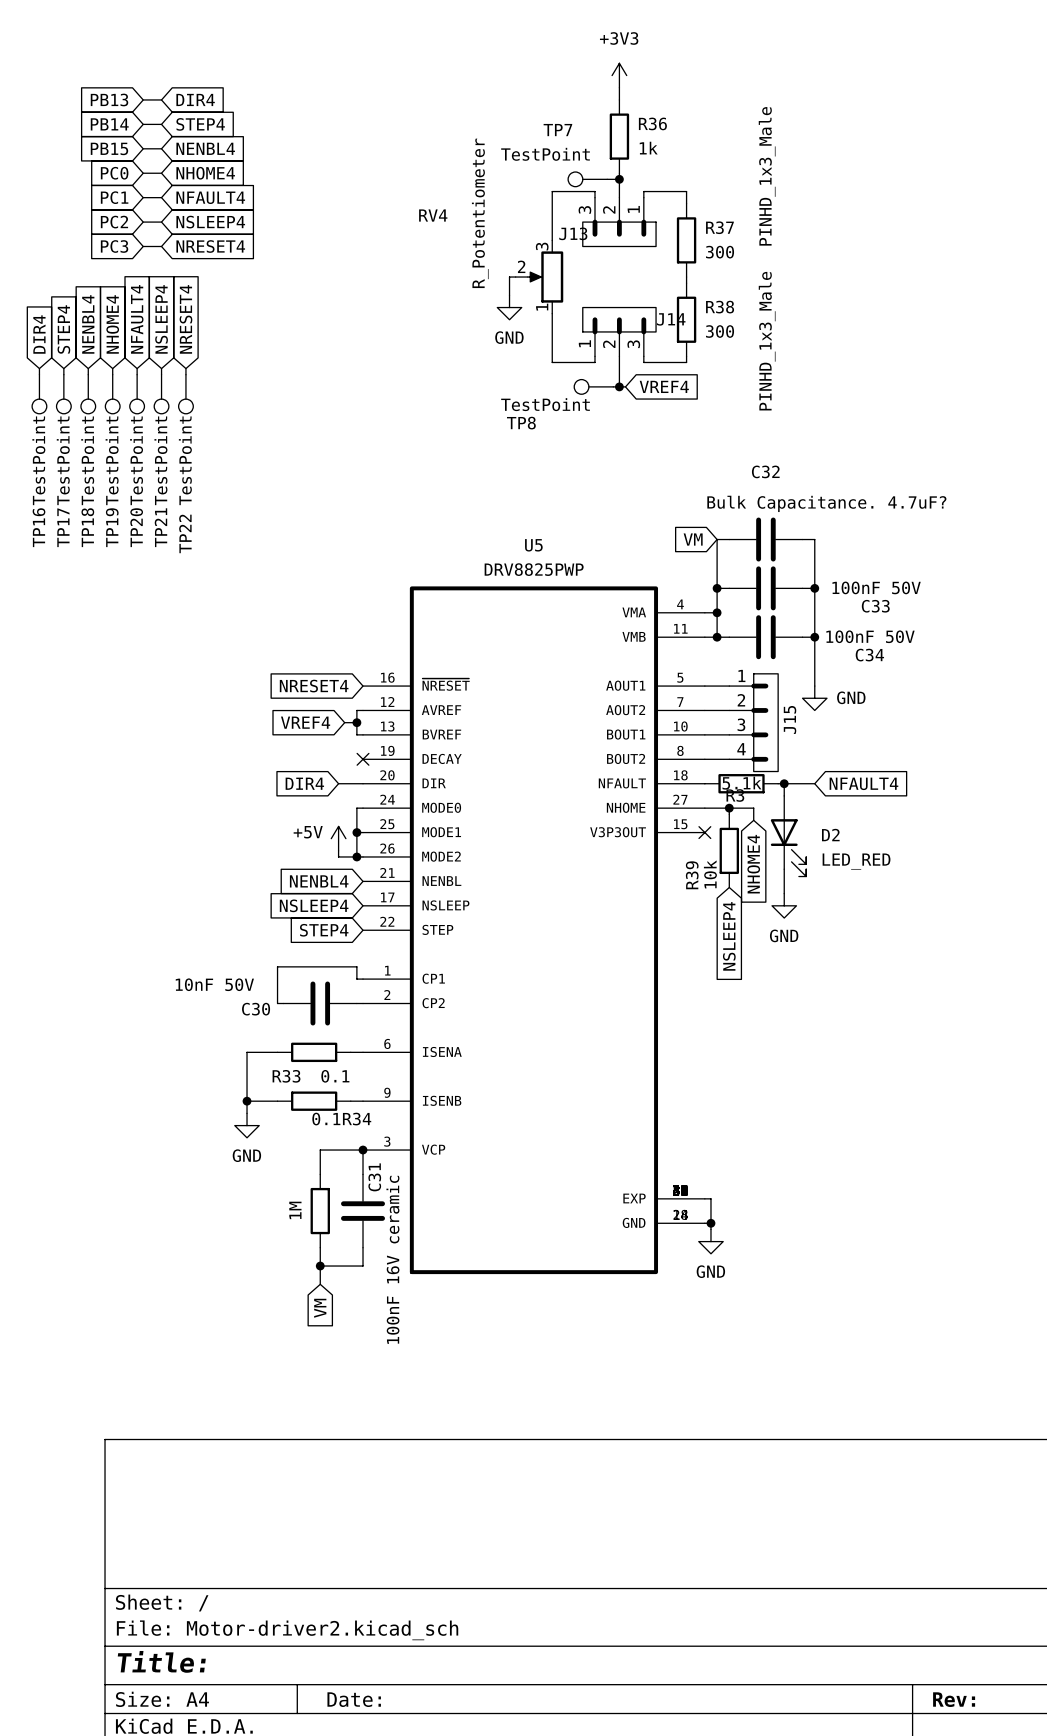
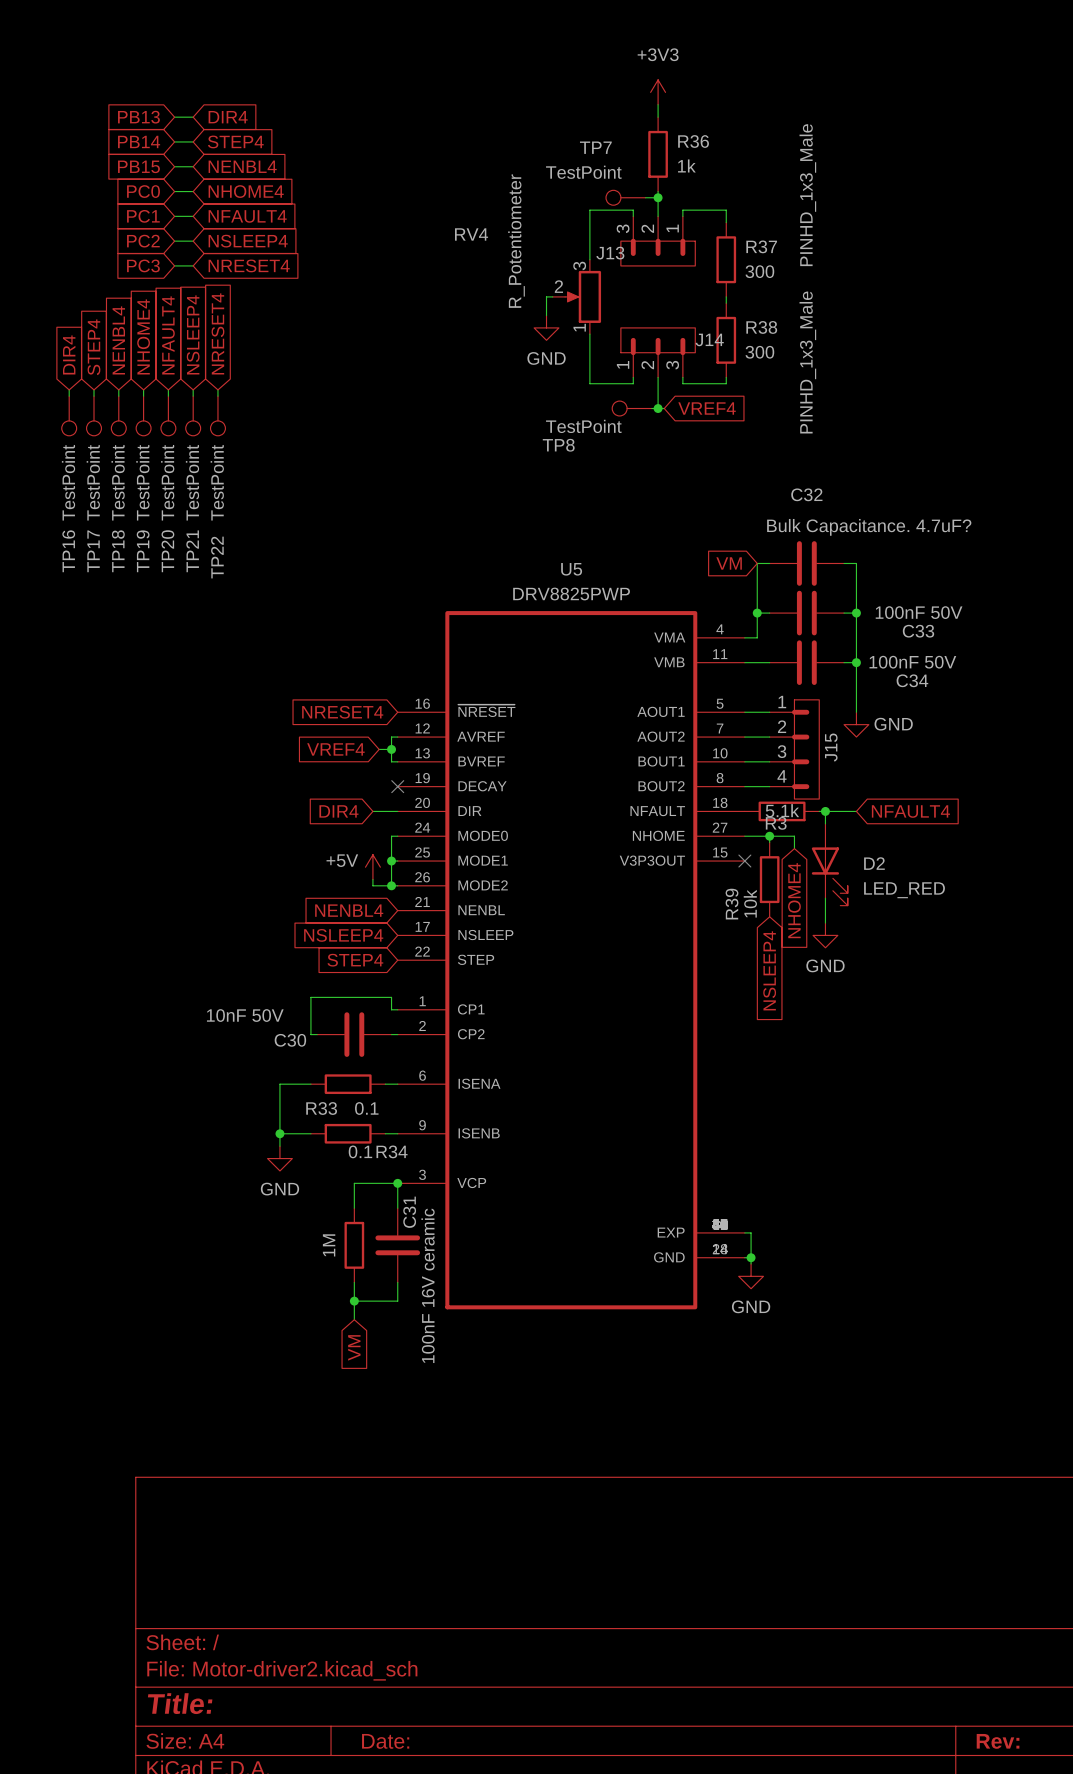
wire: (717, 612) (717, 637) -> none
junction: (717, 612) -> none
junction: (717, 637) -> none

